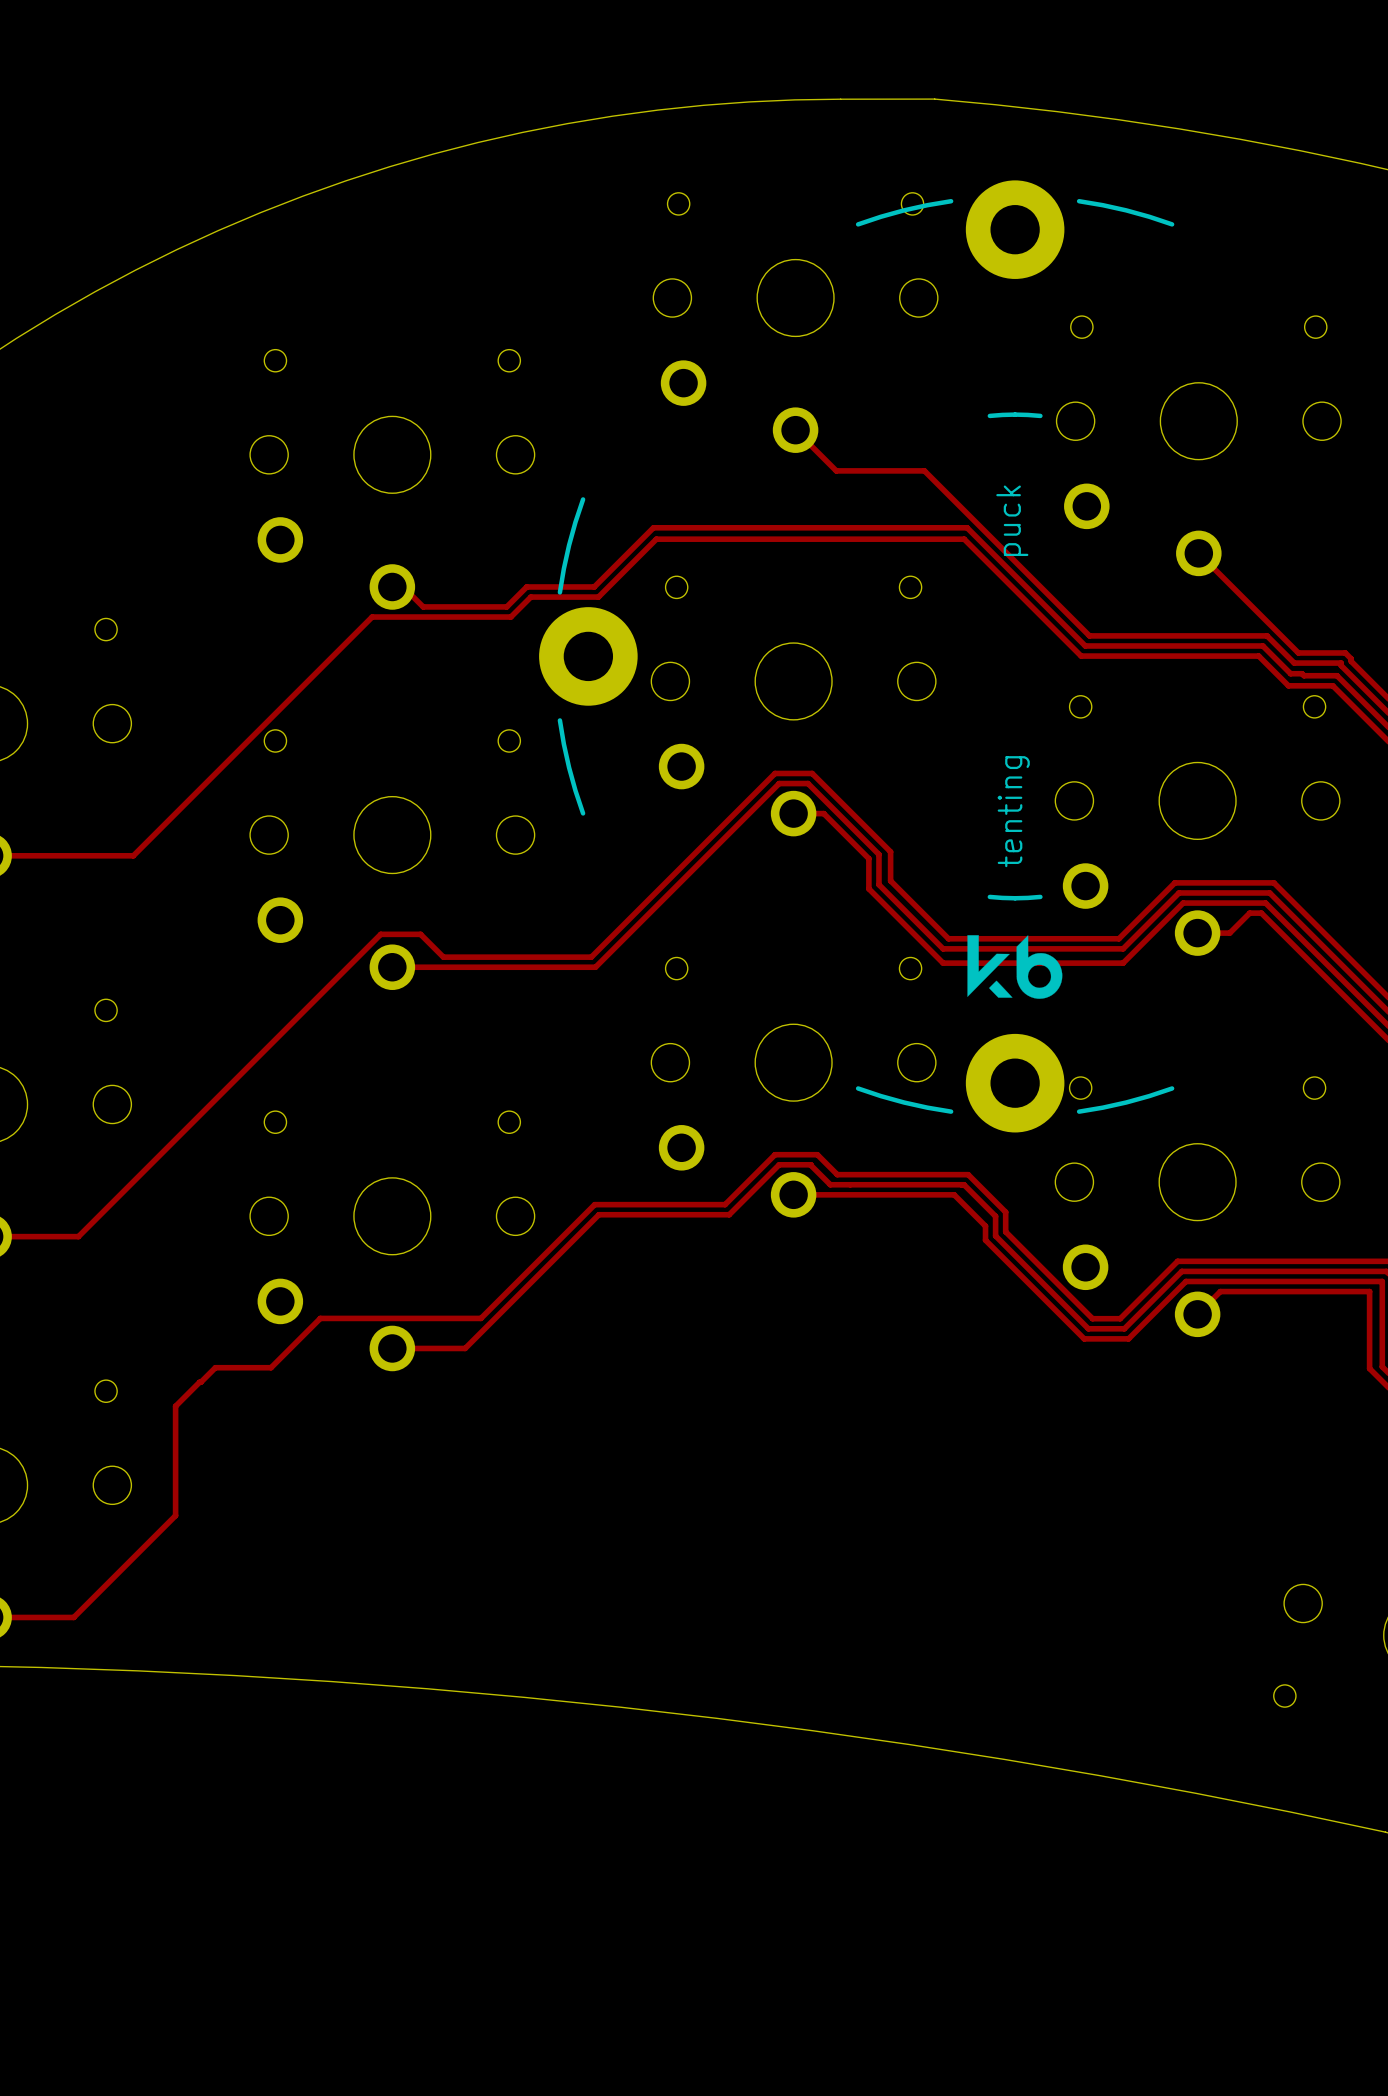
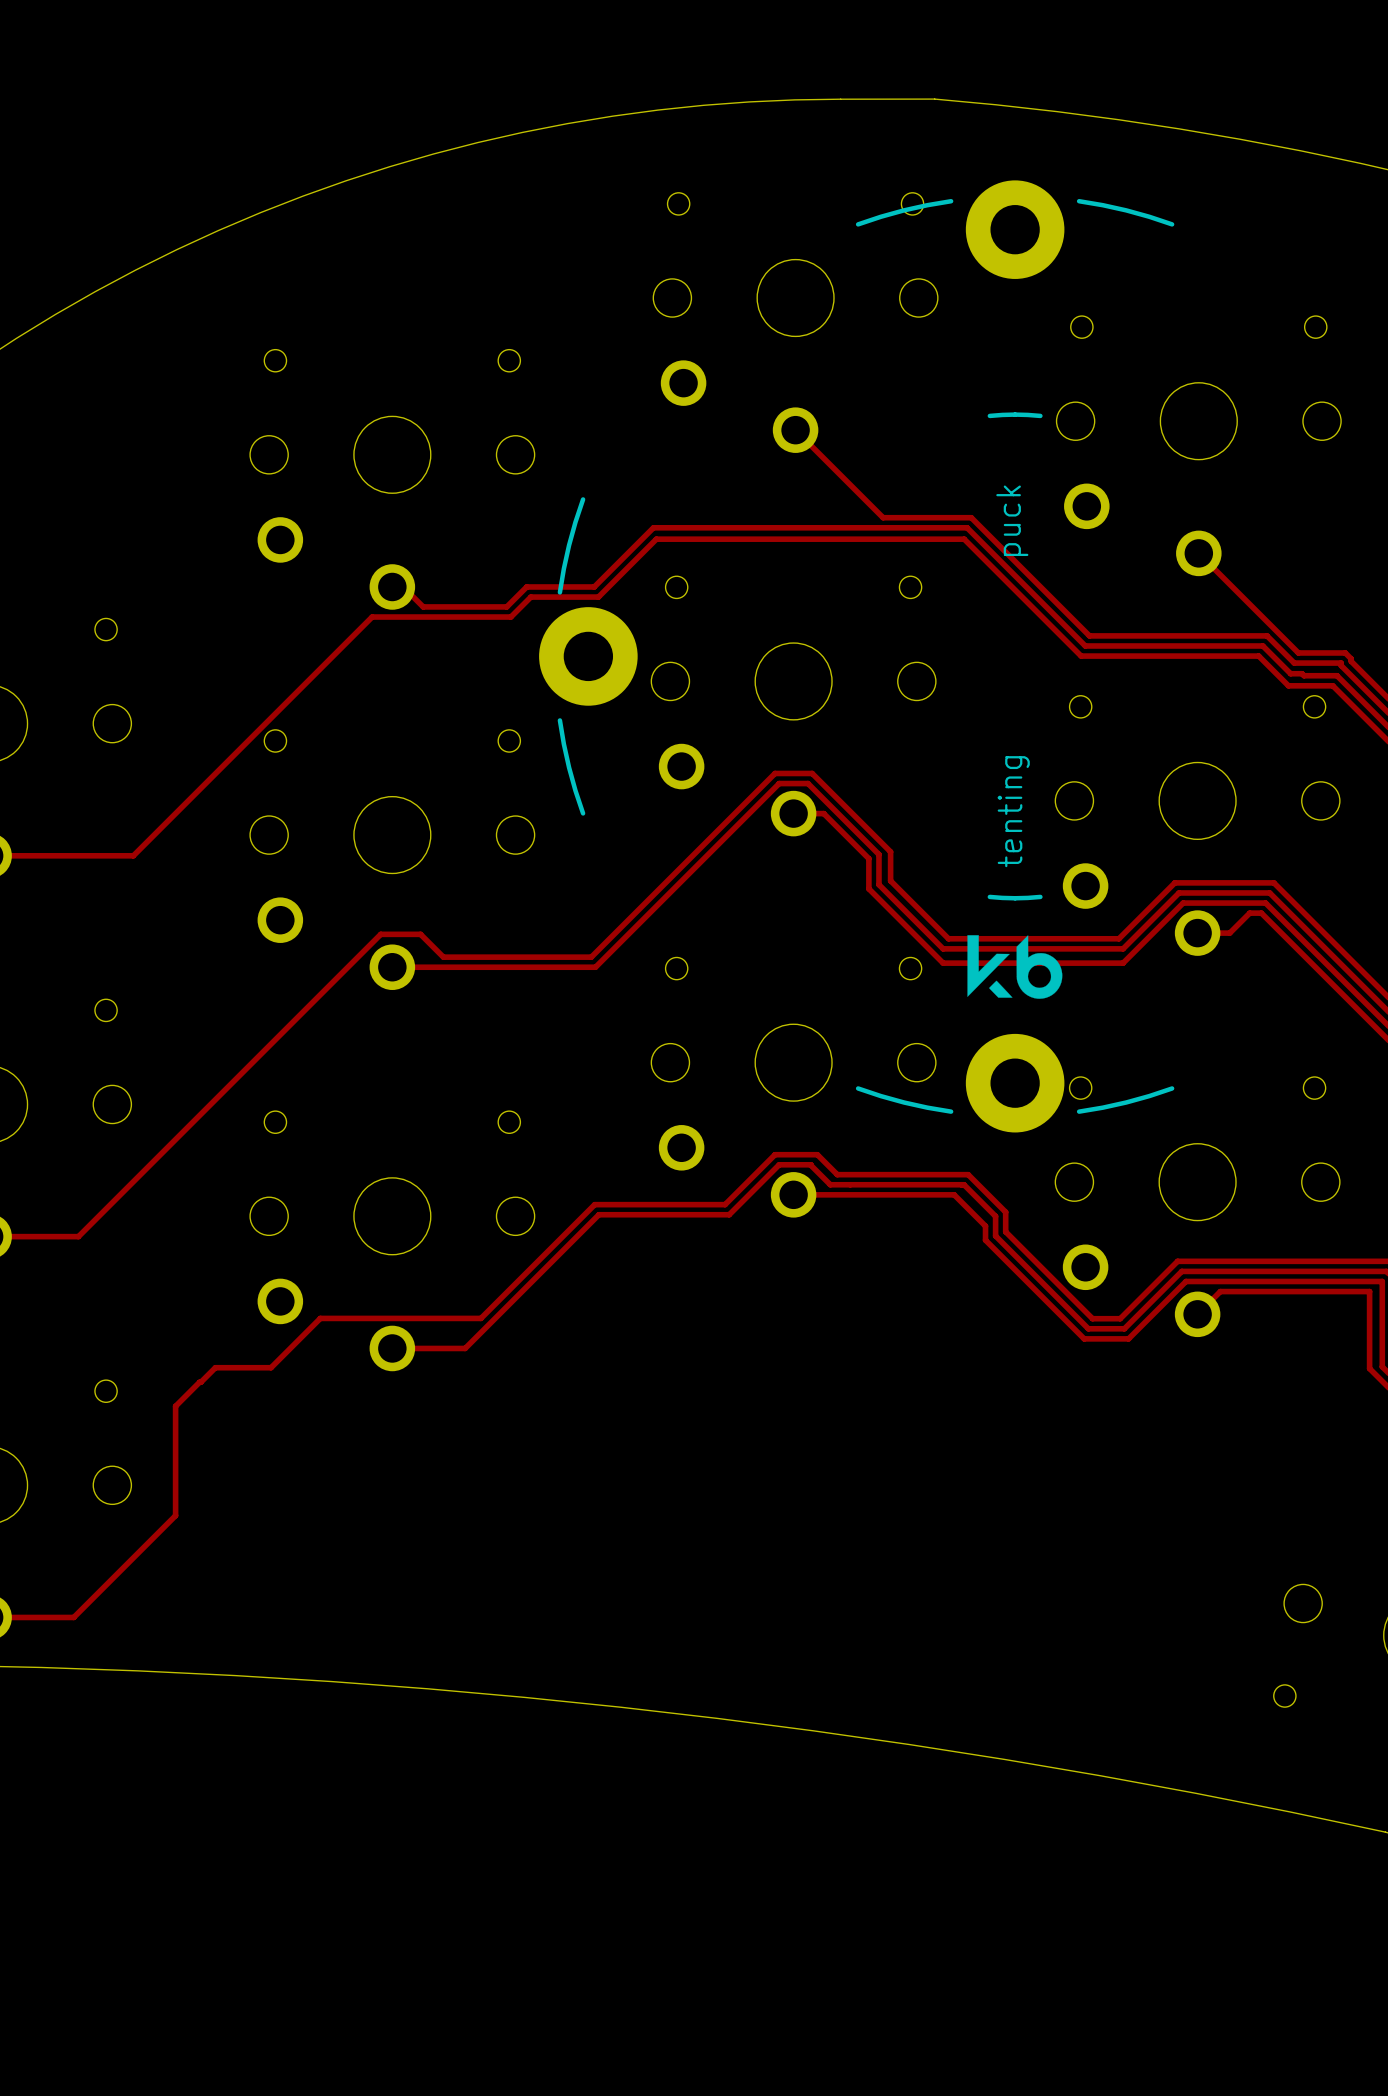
top track: (836, 470) (924, 470) (971, 517) -> (836, 470) (883, 517) (971, 517)

